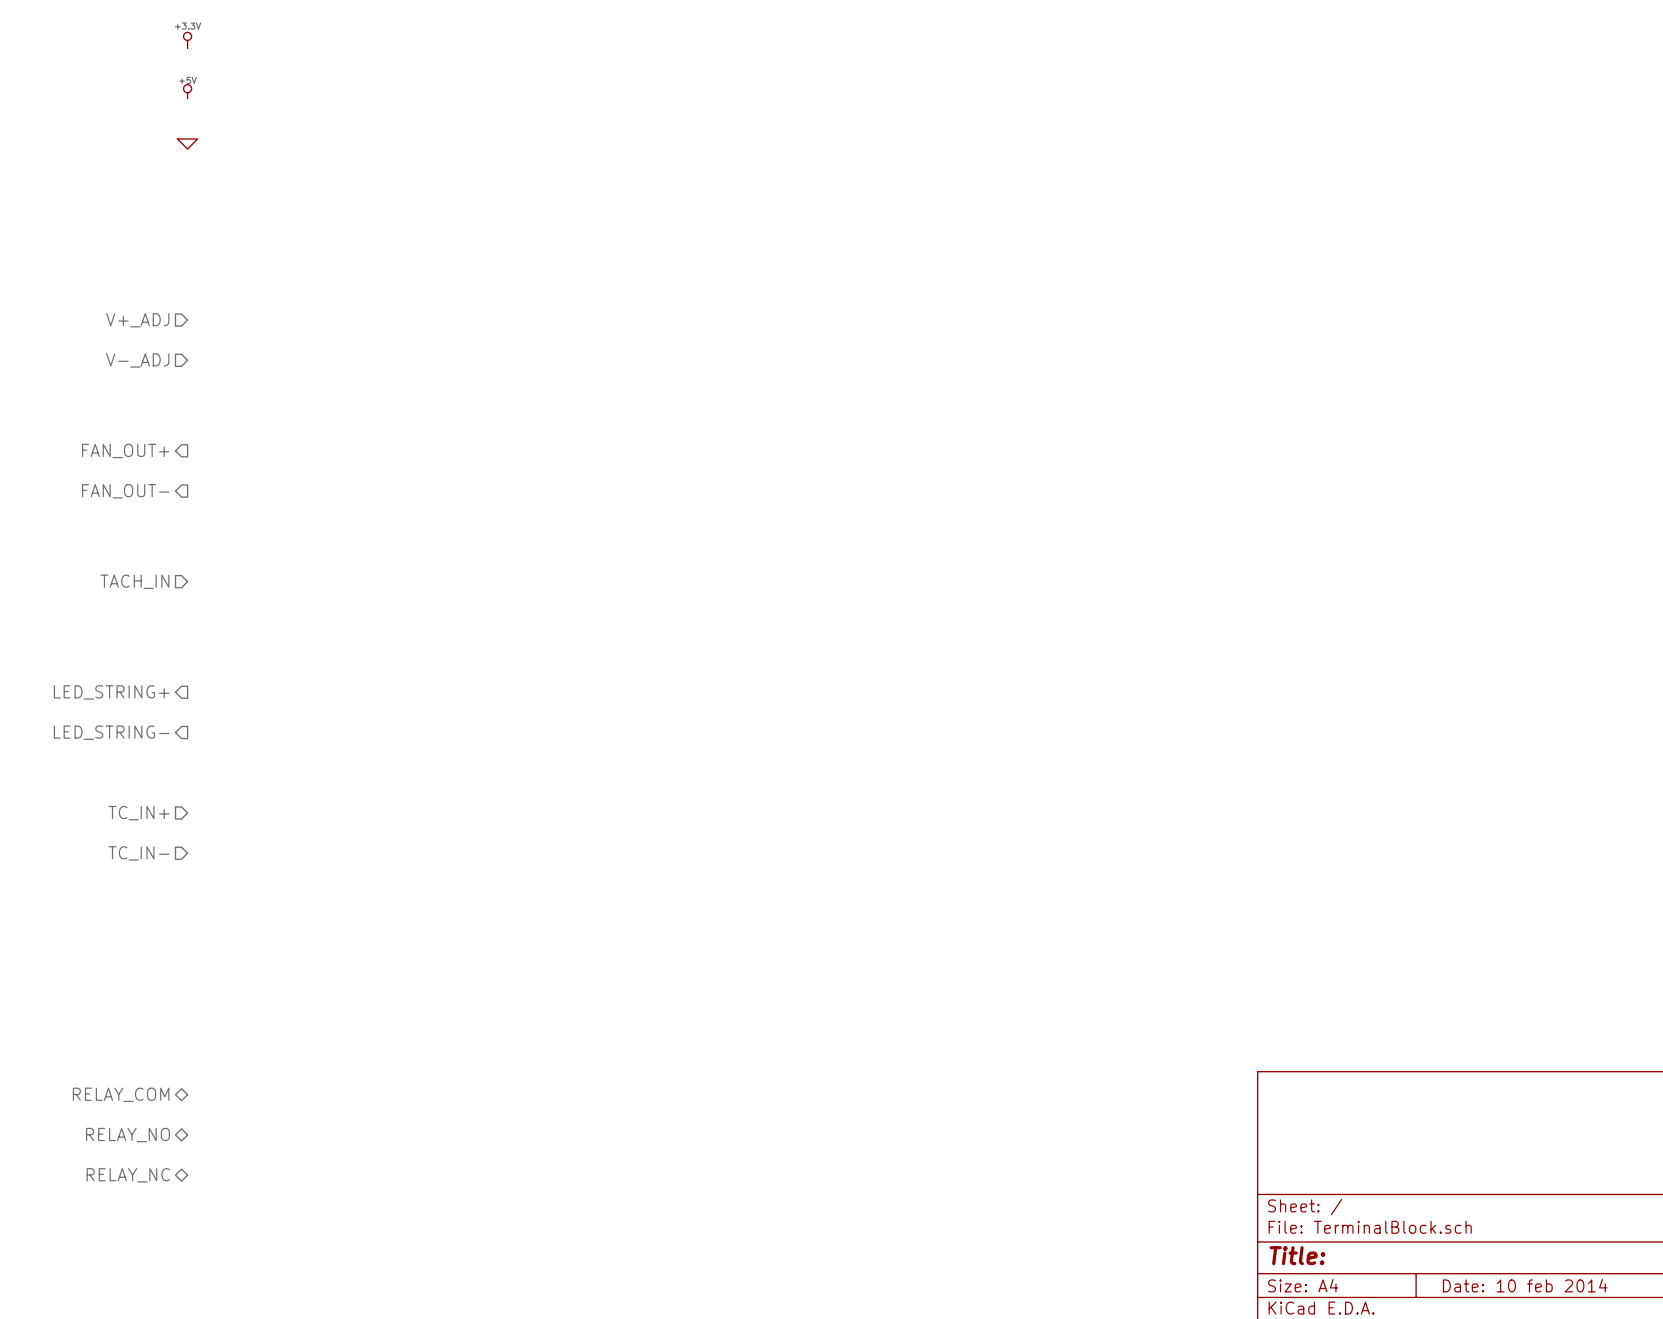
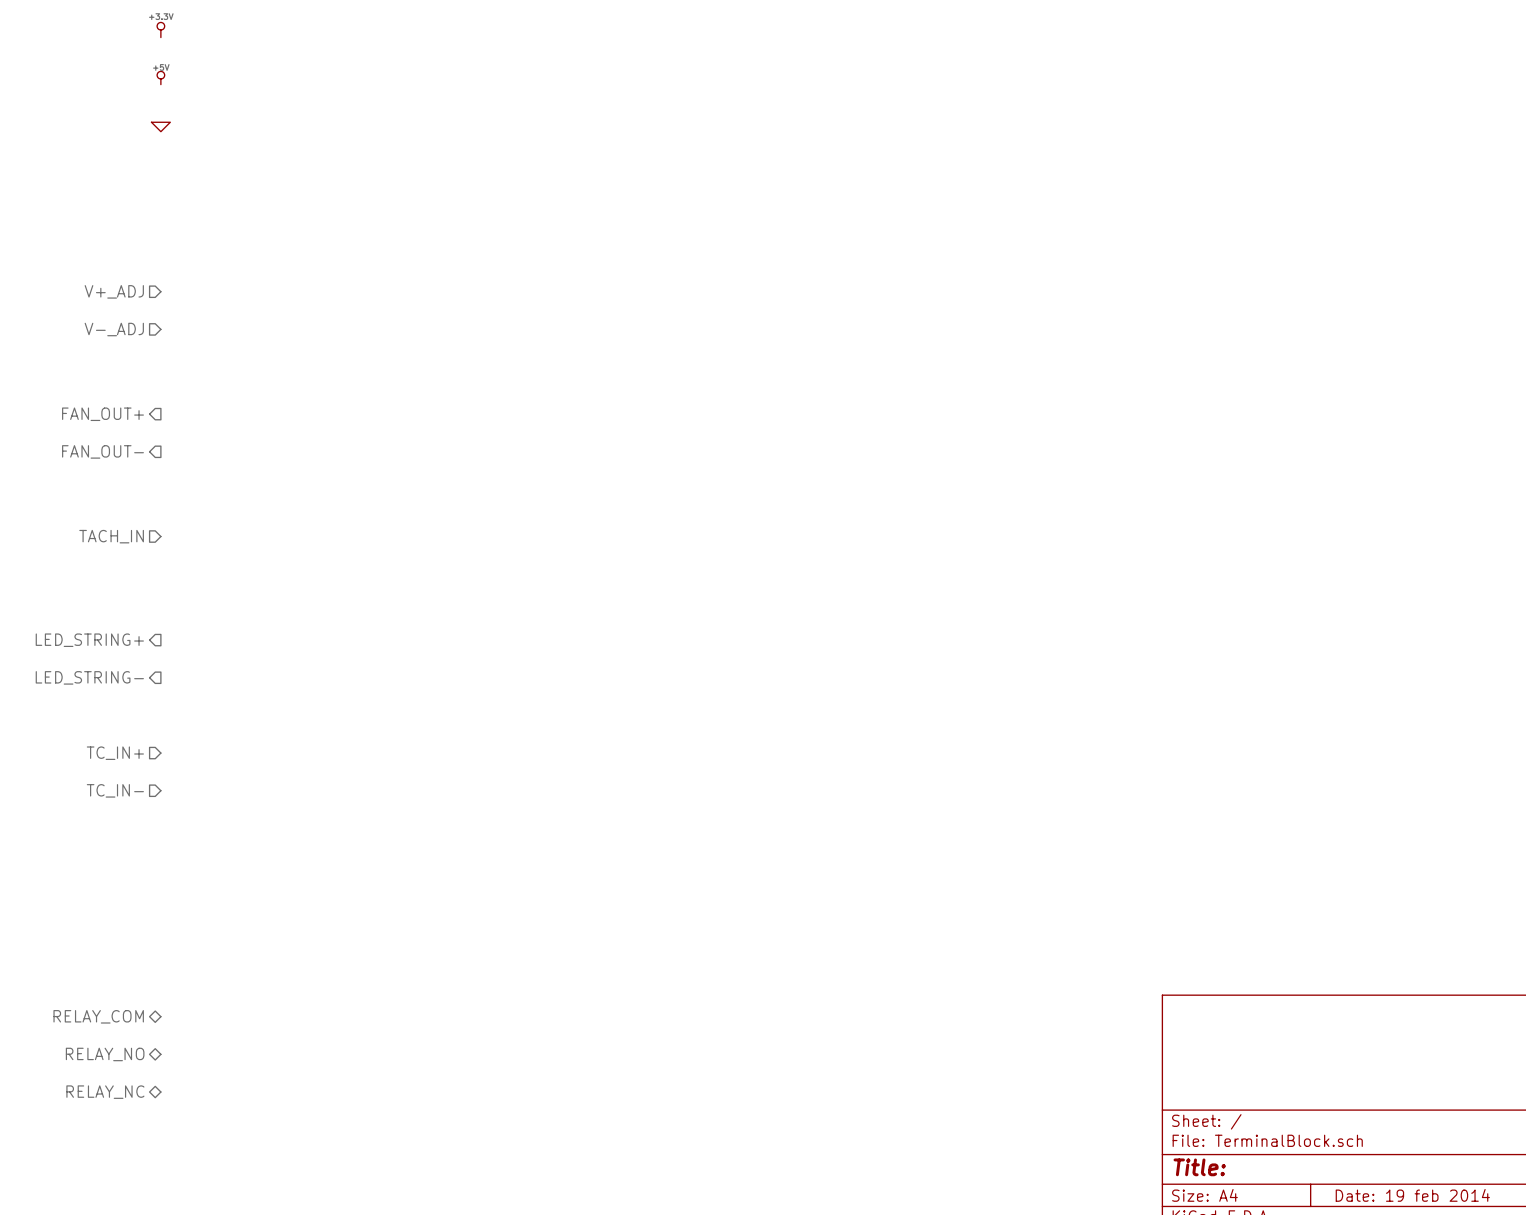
title block: Date: 10 feb 2014 (1525, 1285) -> Date: 19 feb 2014 (1412, 1195)

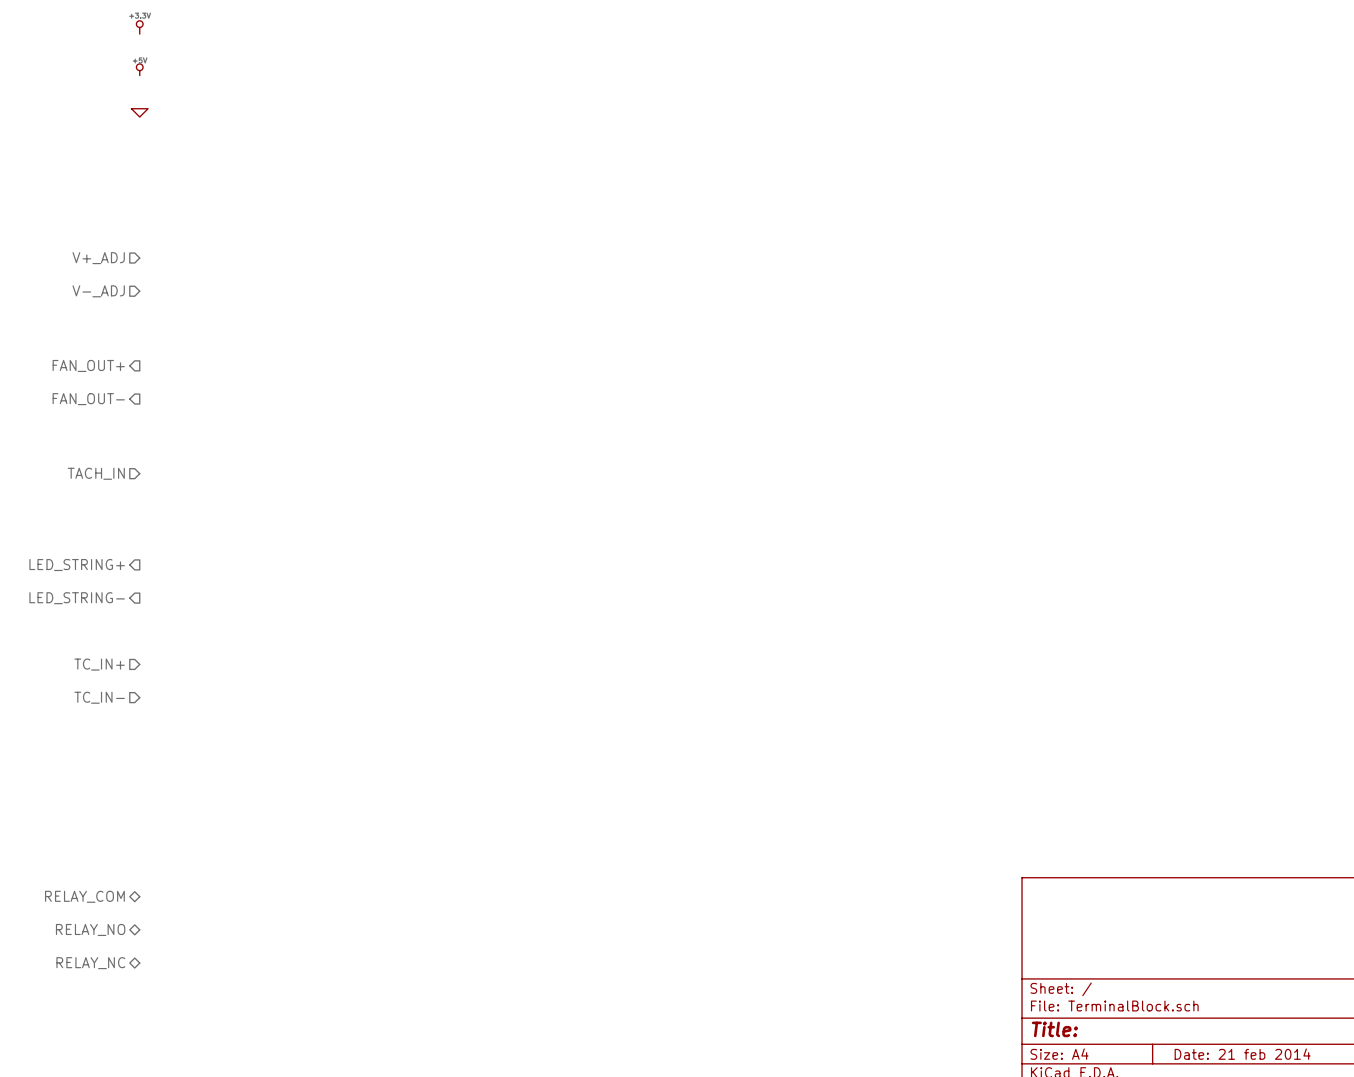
title block: Date: 19 feb 2014 (1412, 1195) -> Date: 21 feb 2014 (1242, 1054)

